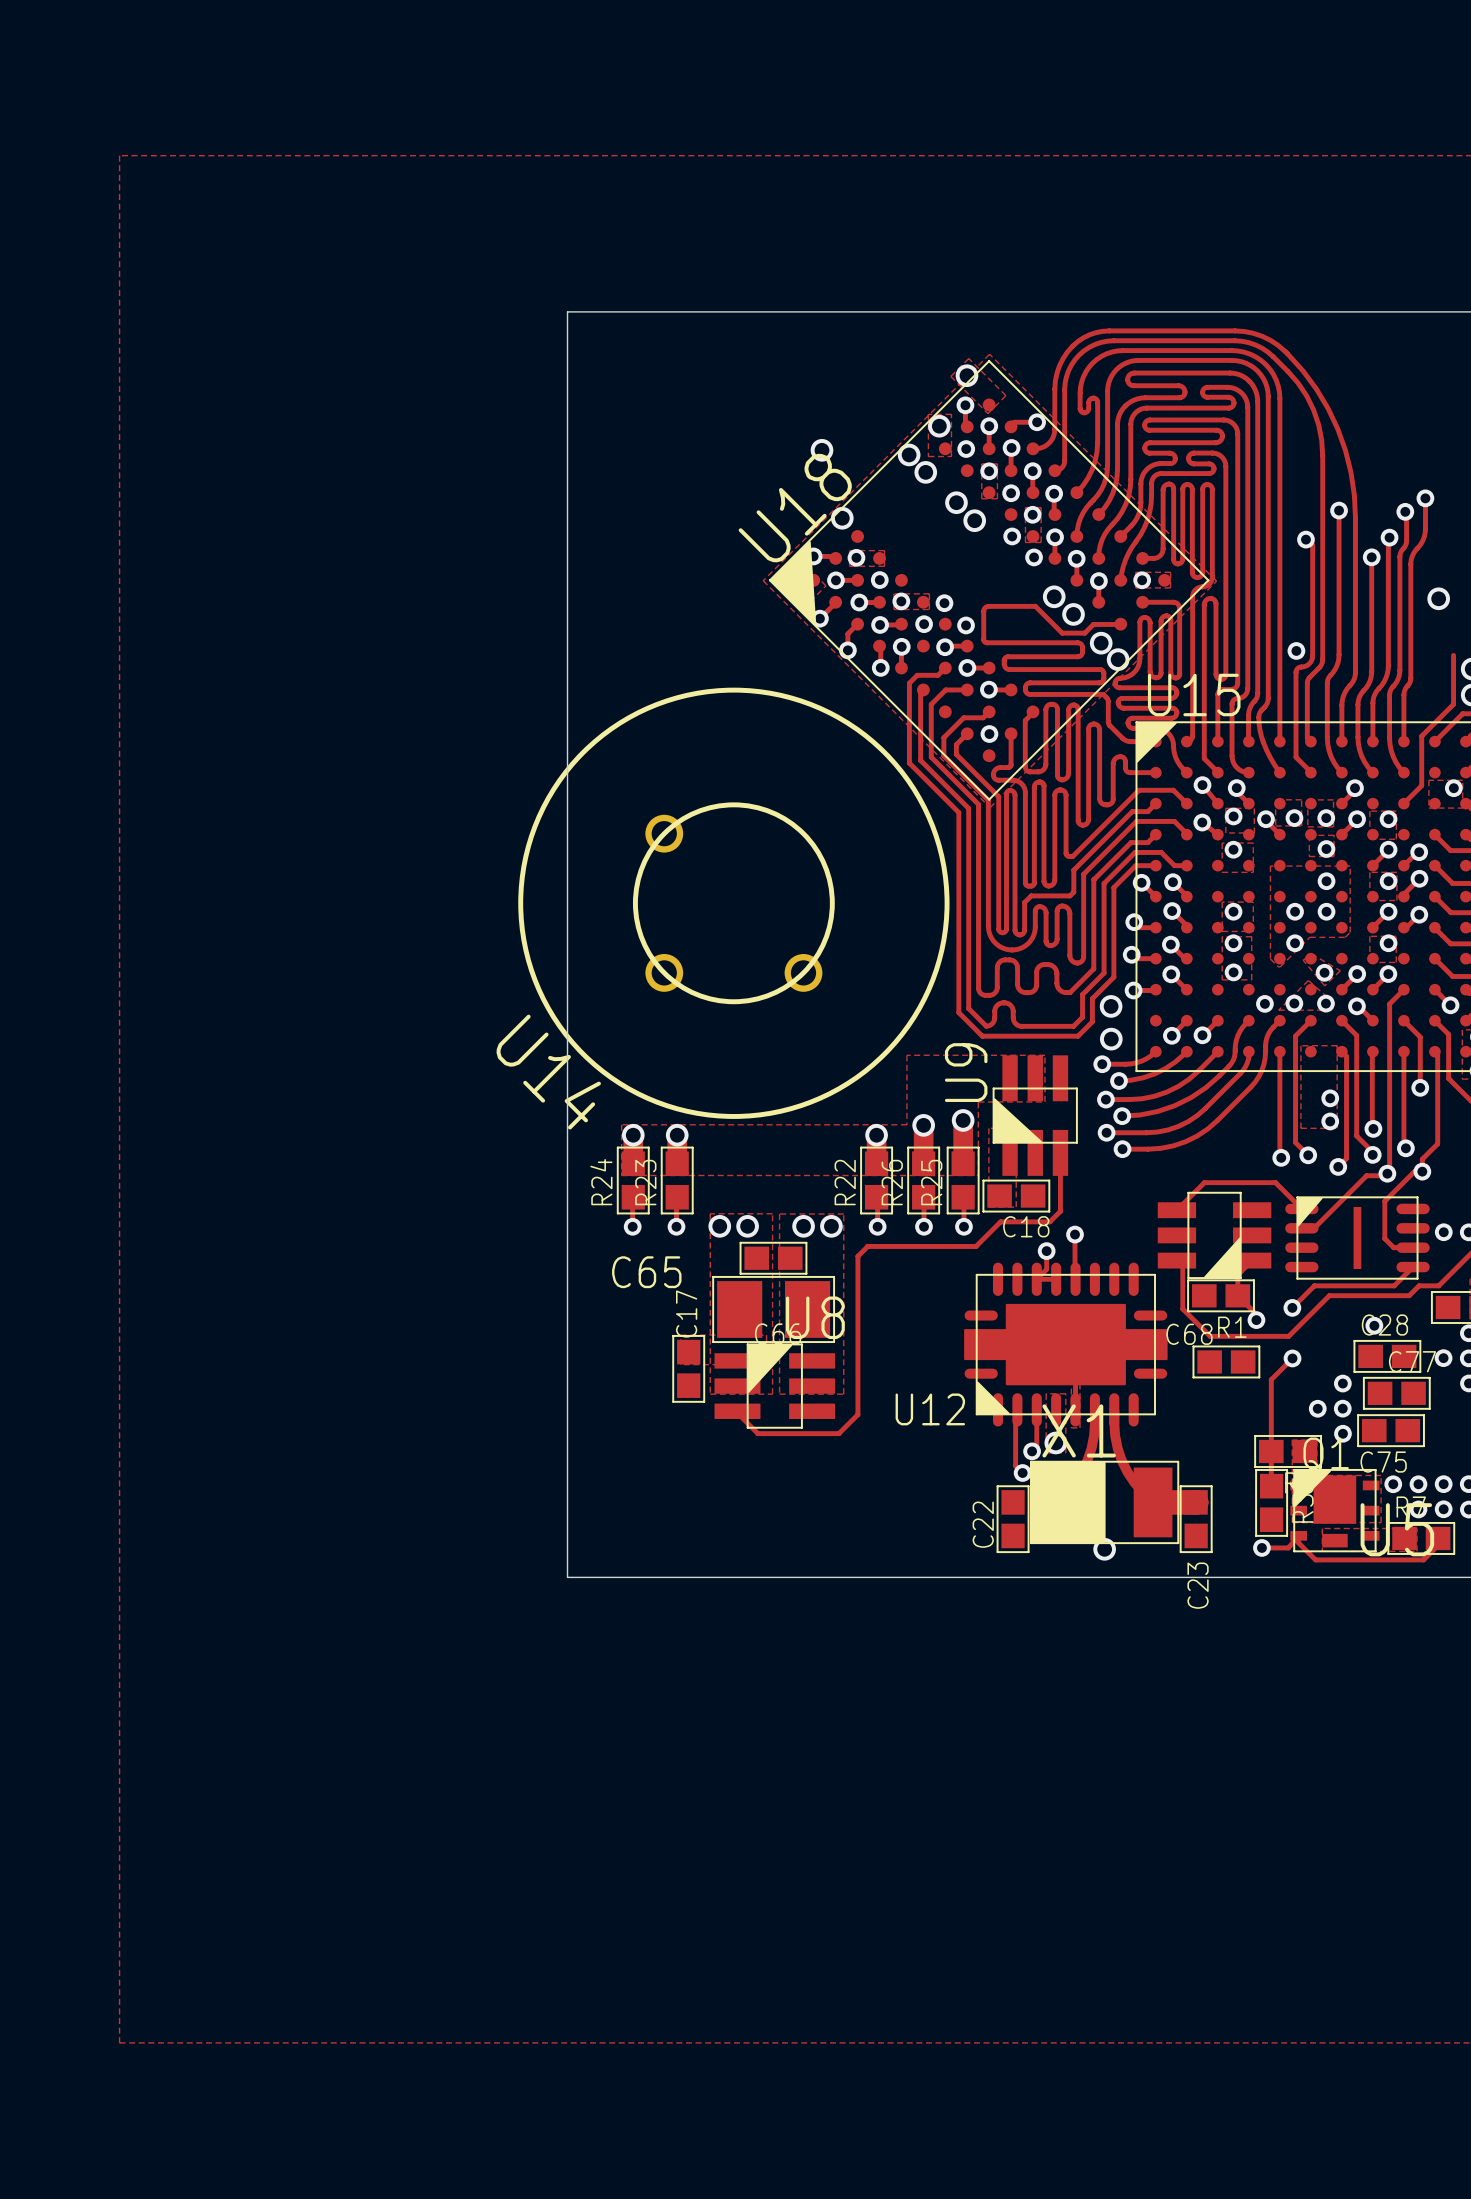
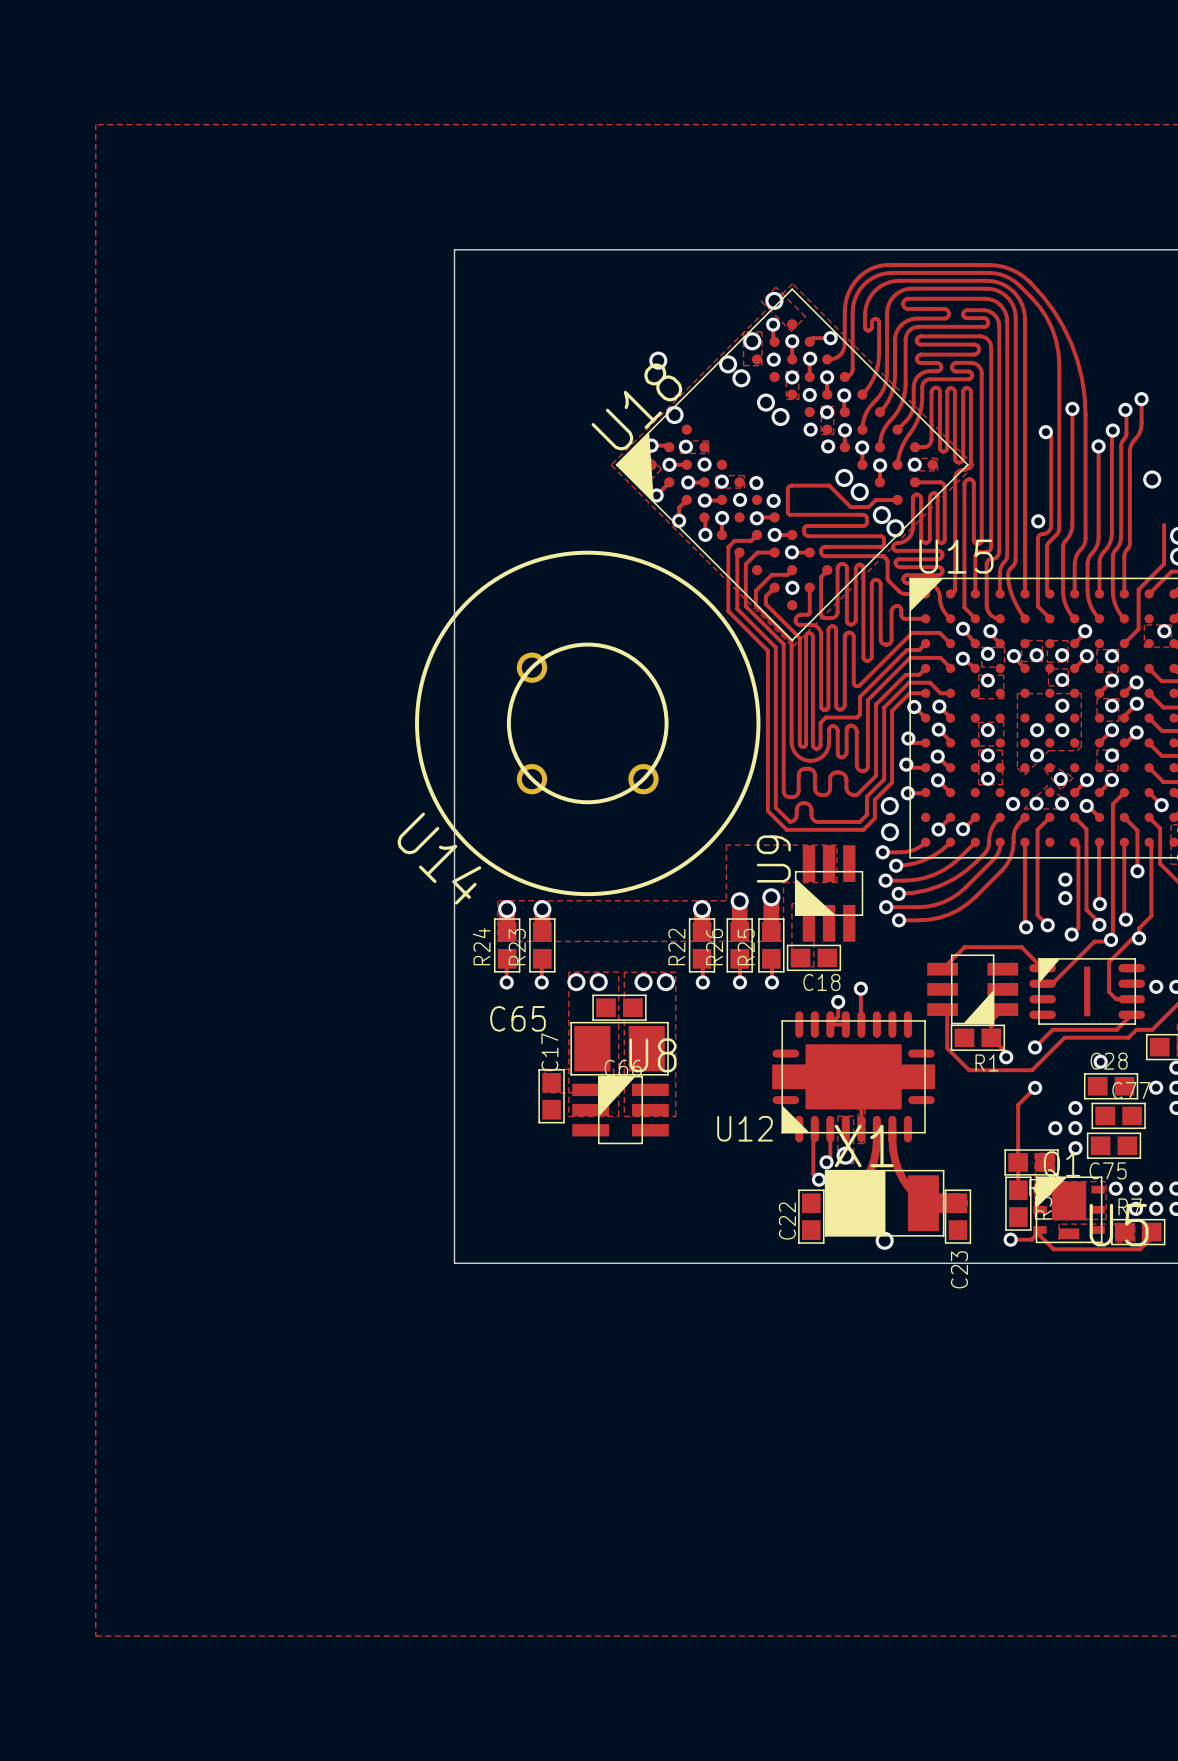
zone outline: (1300, 1045) (1300, 1128) (1337, 1128) (1337, 1045) (1300, 1045) -> none
track: (1060, 1152) (1060, 1211) (1049, 1221) (1000, 1221) (976, 1246) (867, 1246) (857, 1256) (857, 1414) (838, 1433) (758, 1433) (737, 1411) -> none
C68: (1226, 1361) -> none

